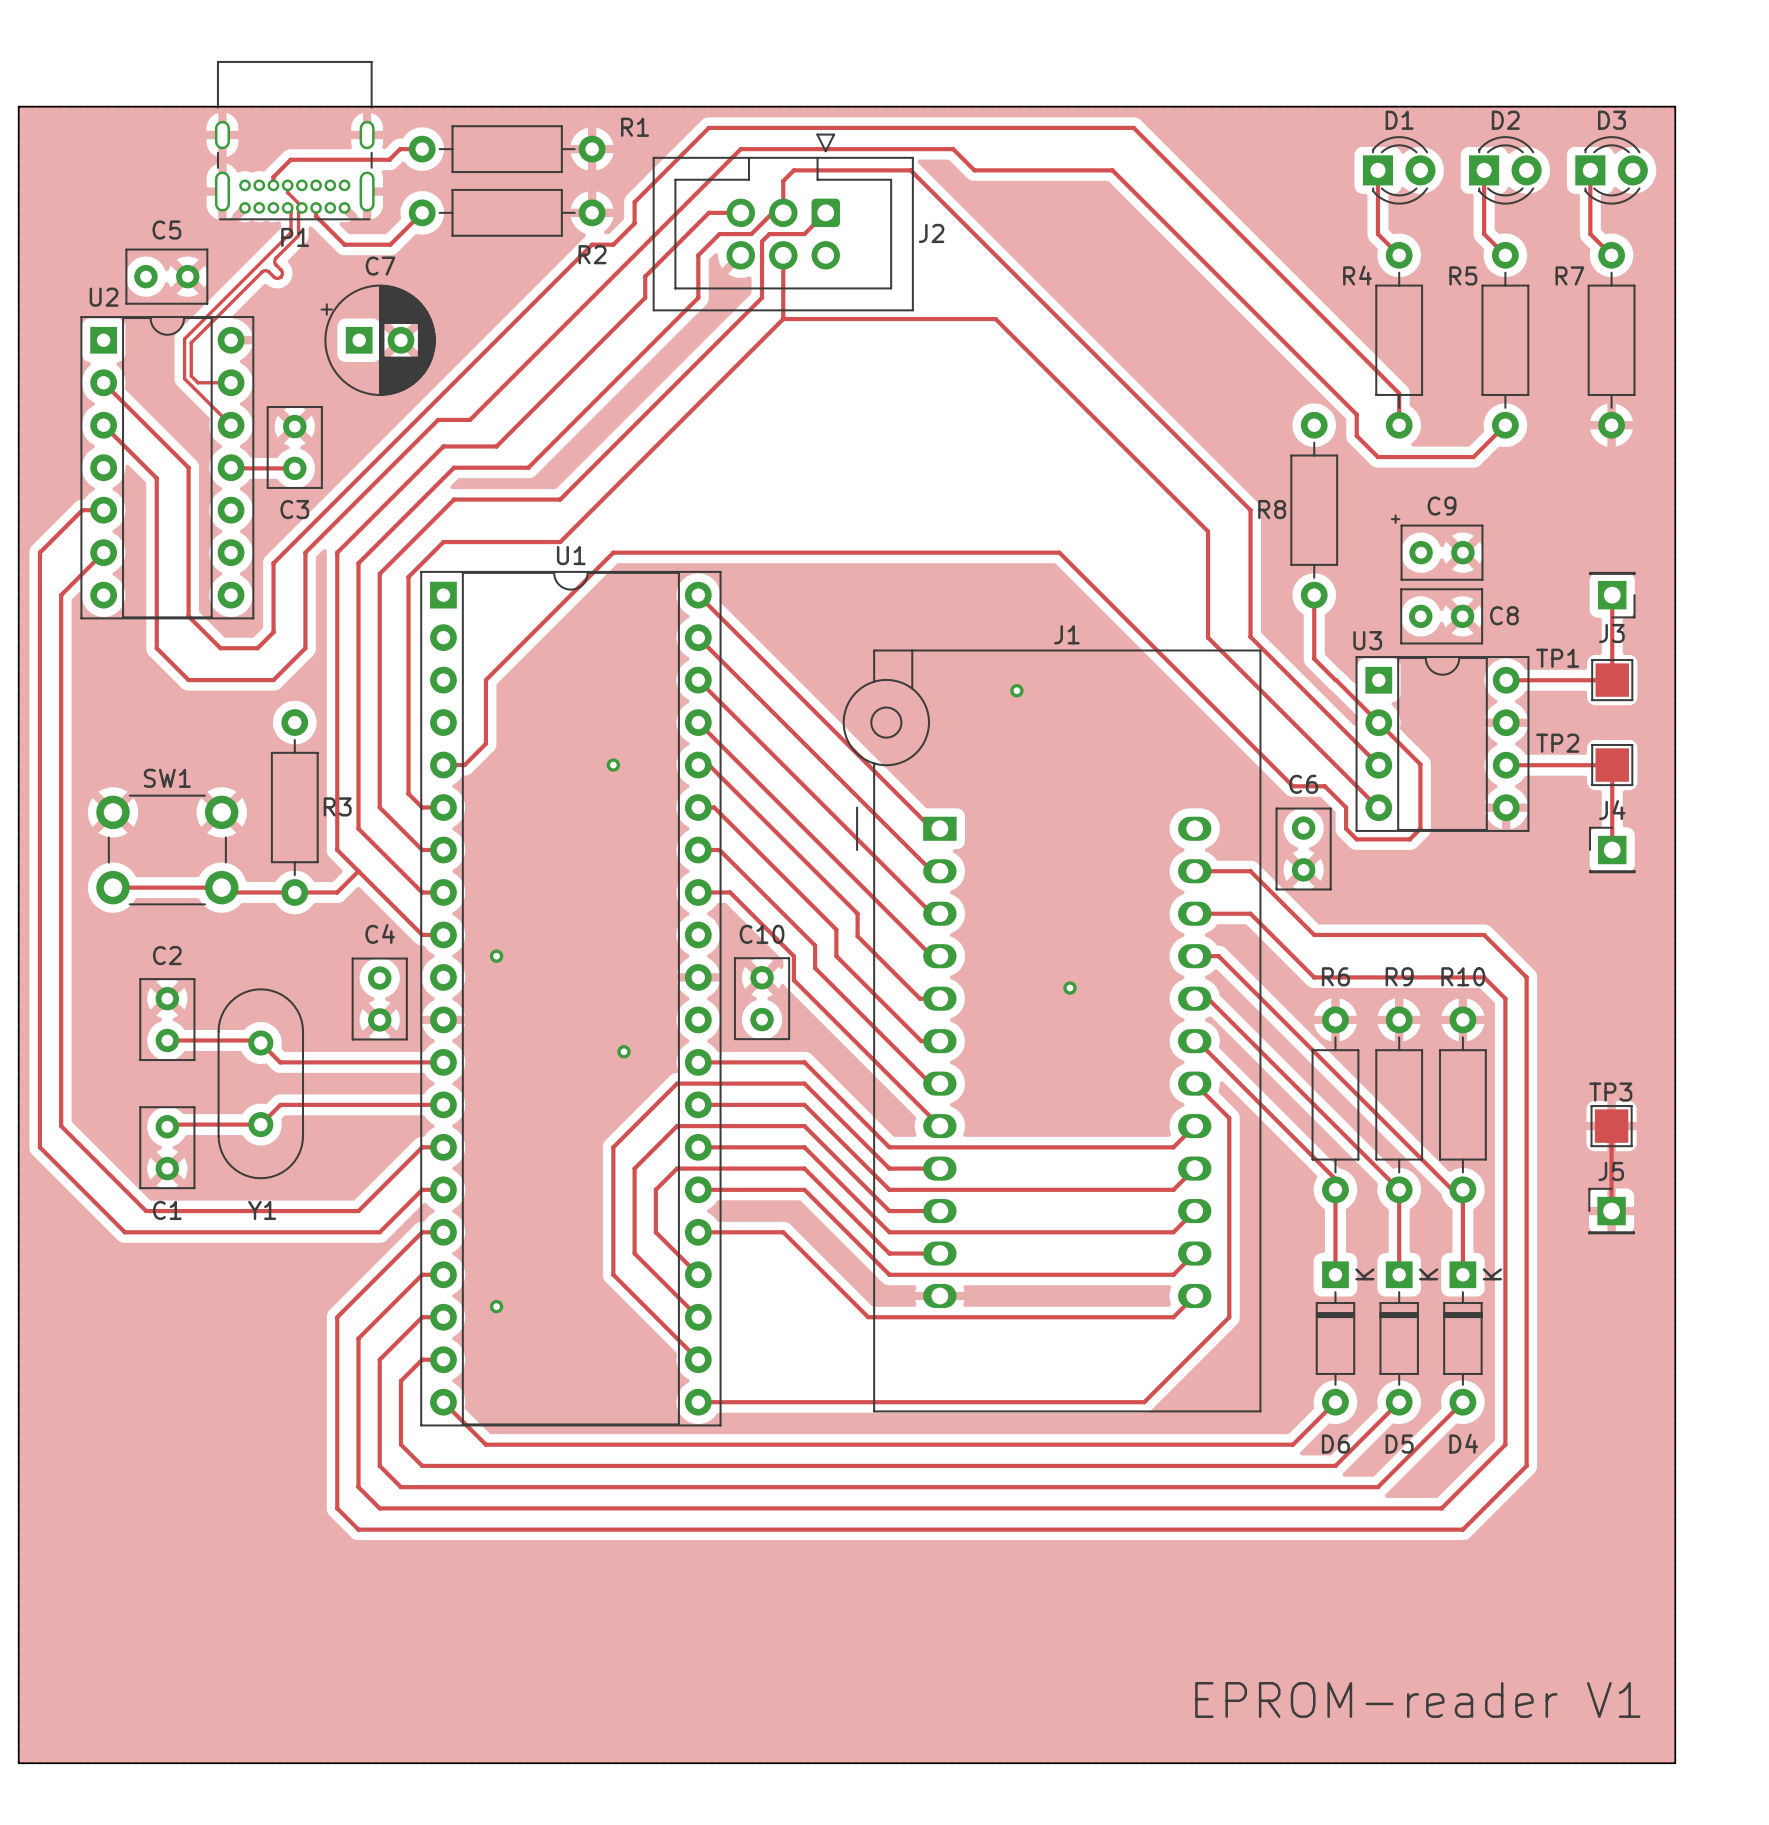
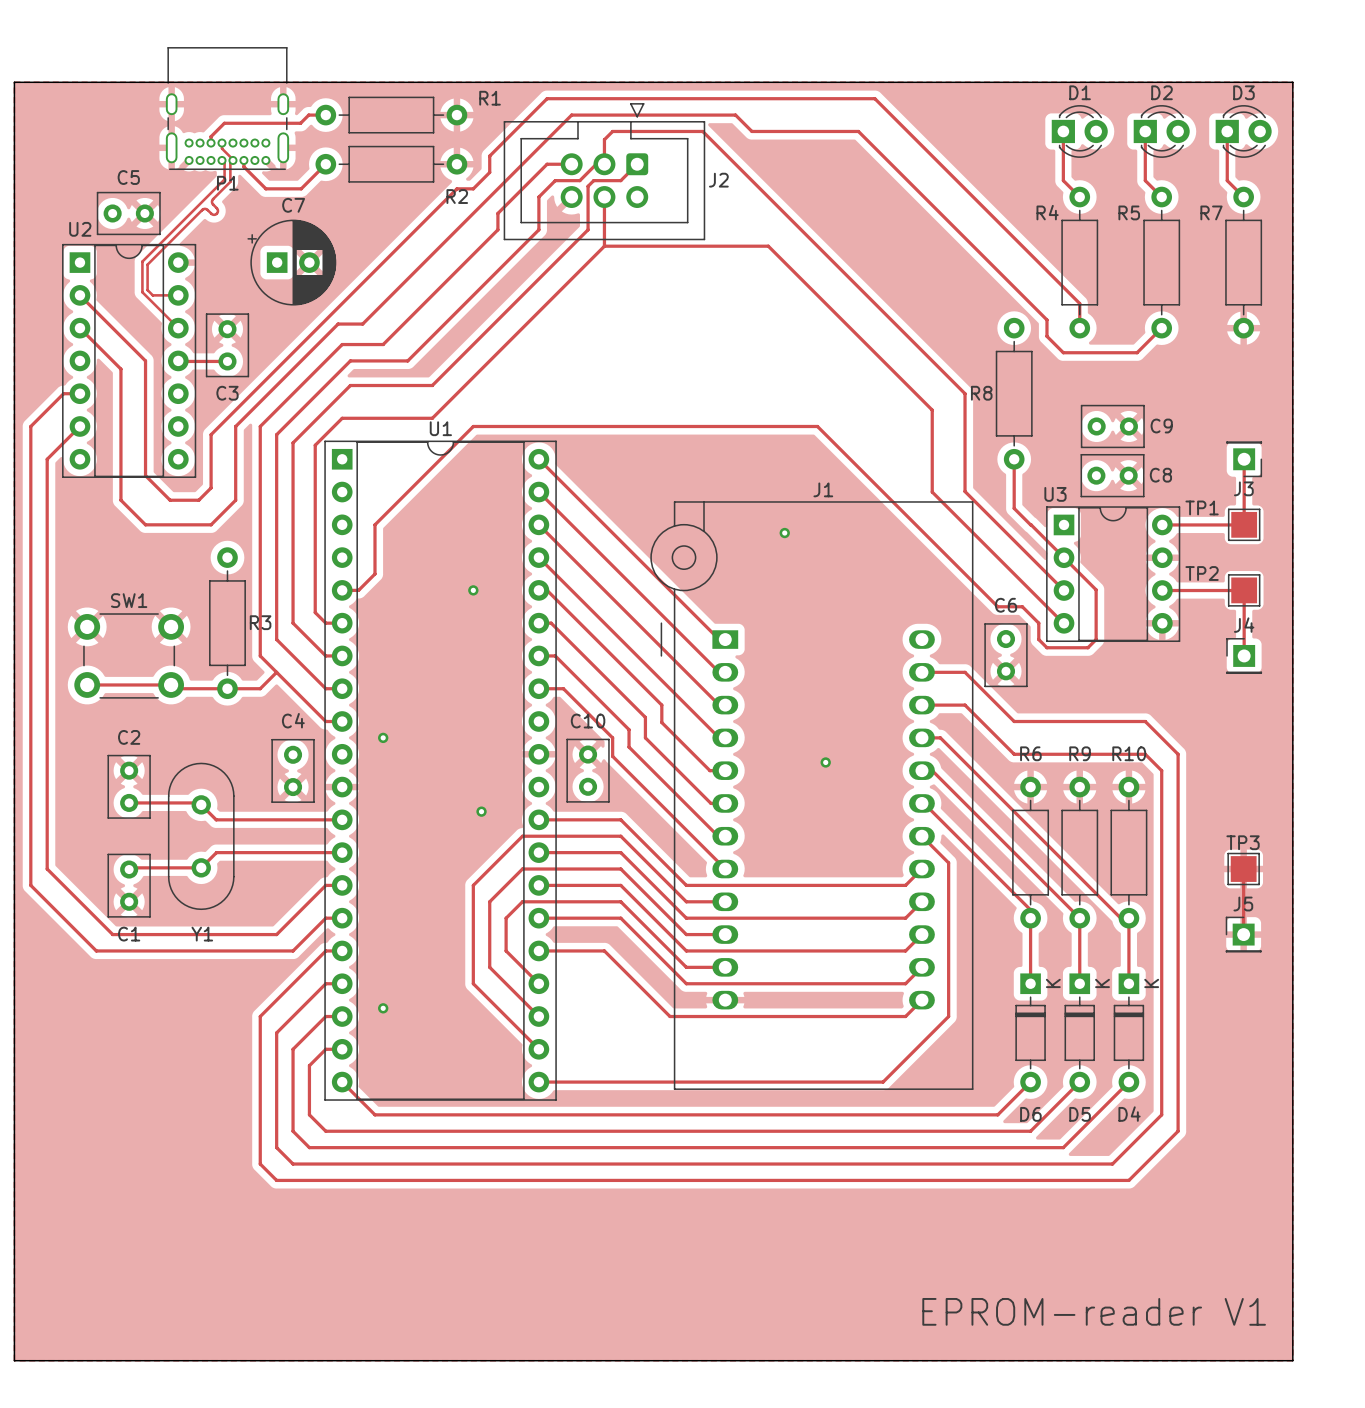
C9 name position: C9 (1442, 506) -> C9 (1161, 426)
C9 footprint: [1390, 514, 1484, 581] -> [1080, 404, 1145, 449]

